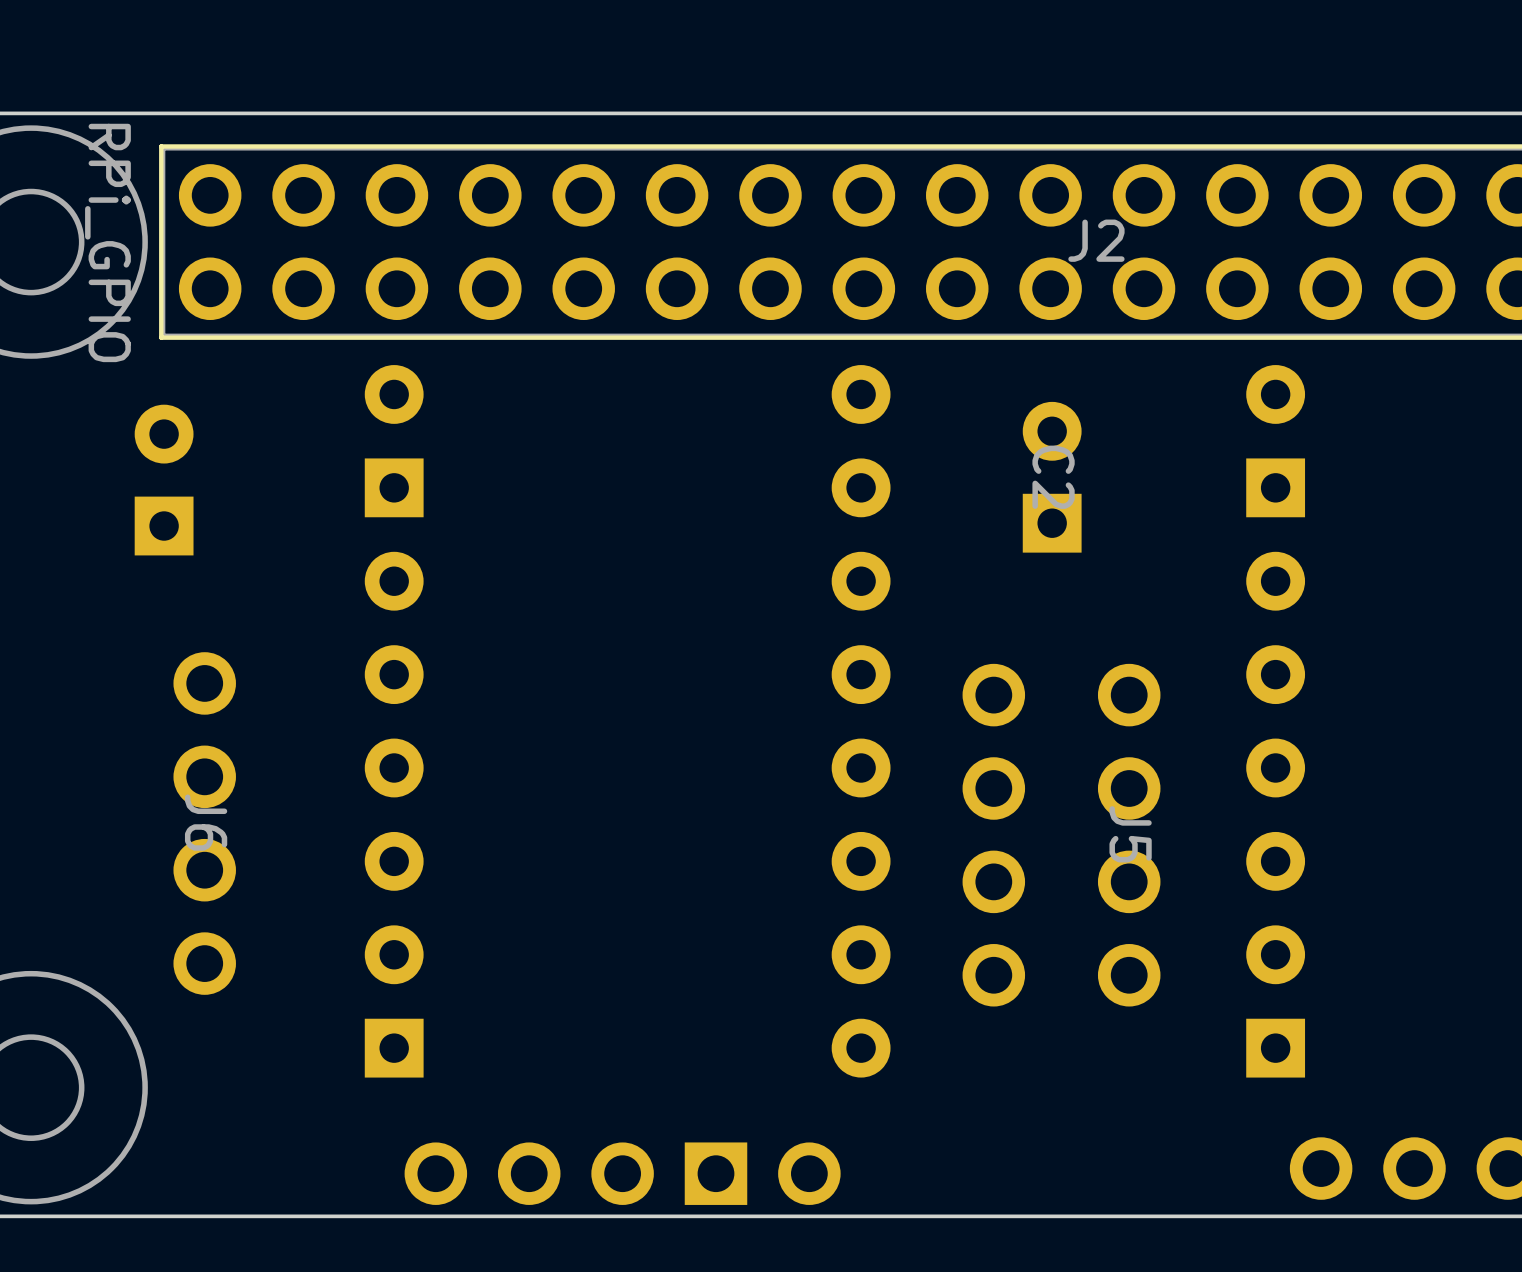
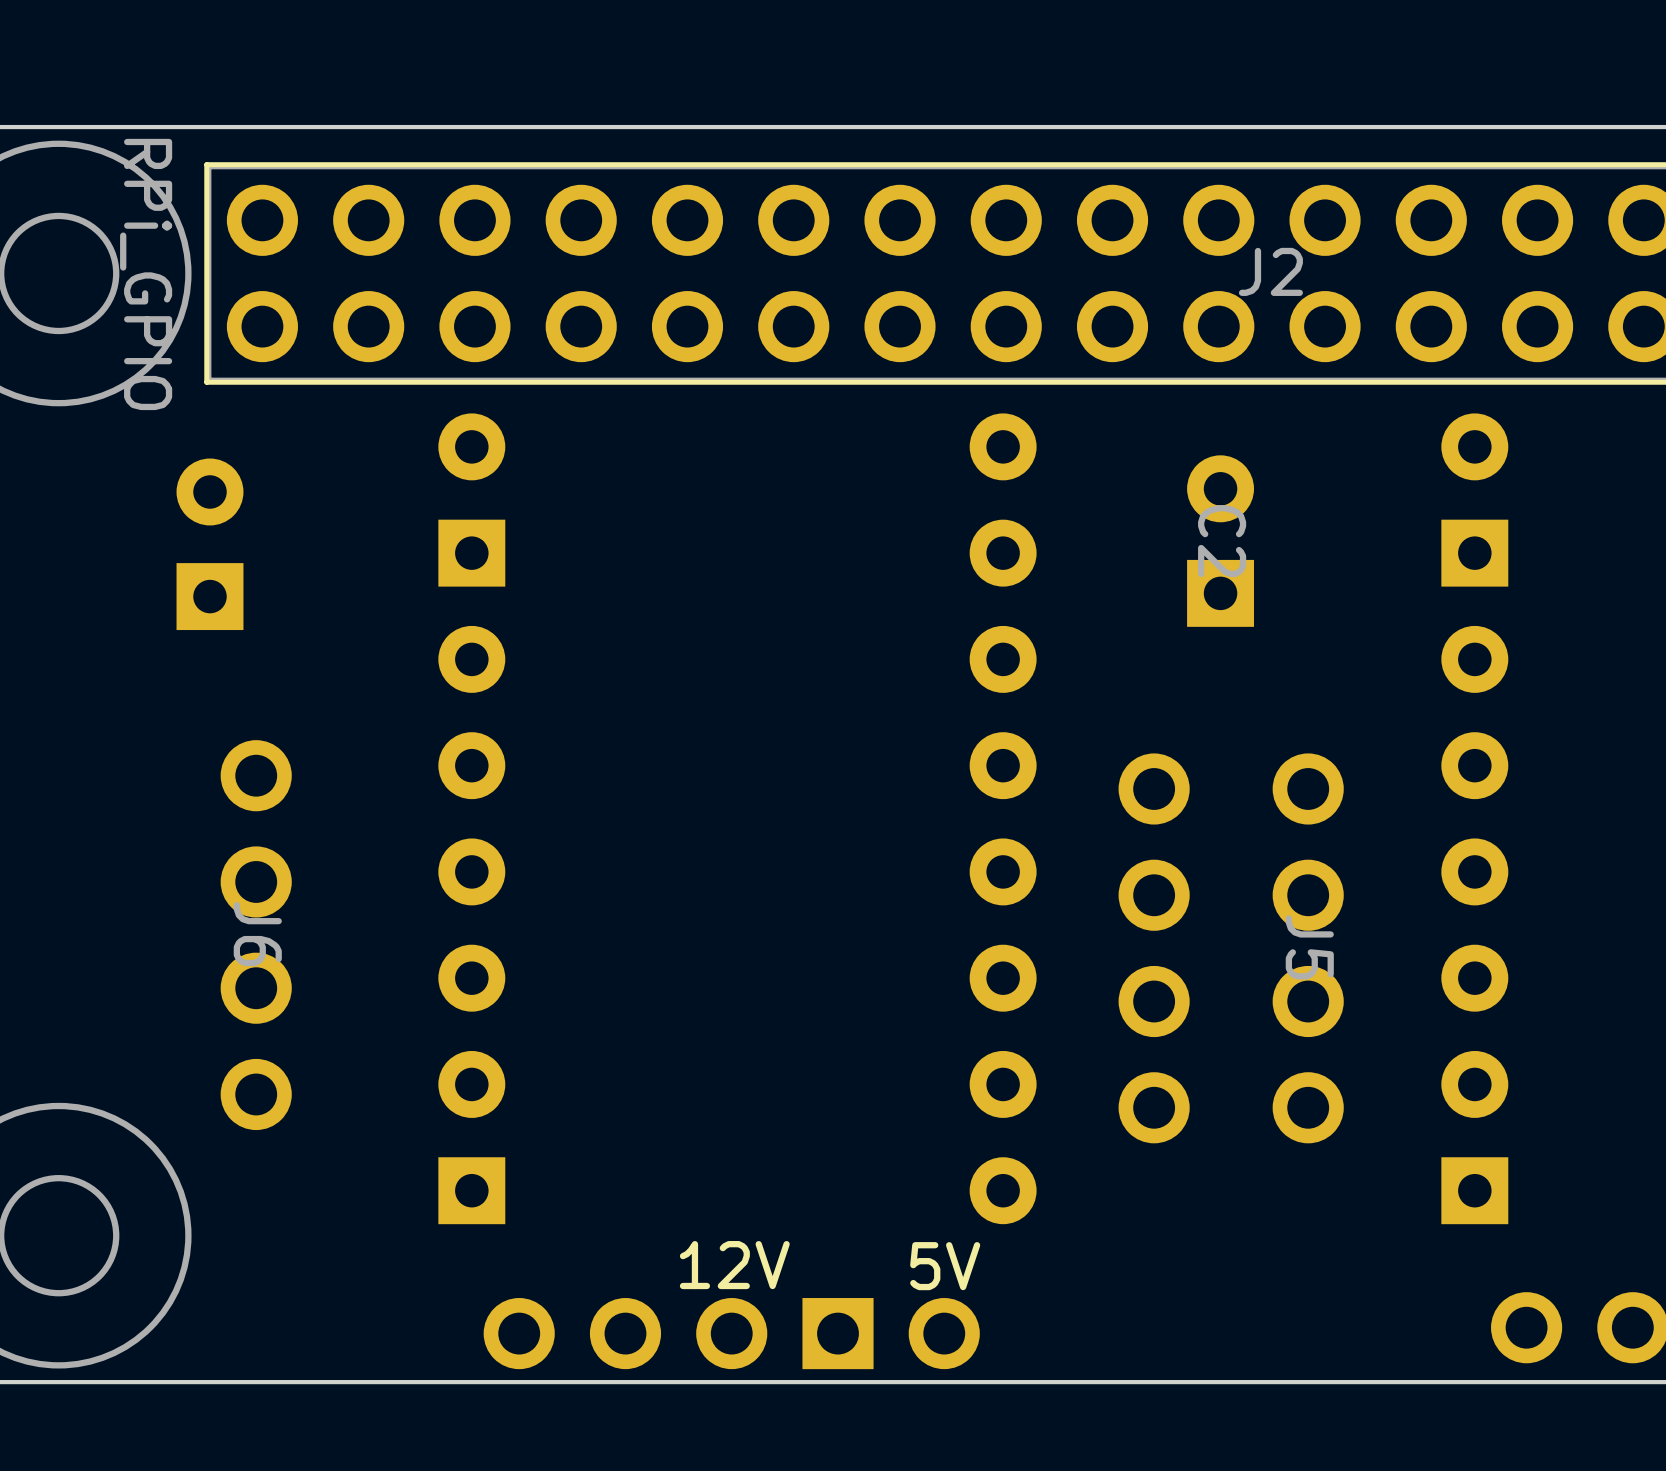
text: none -> 12V (734, 1265)
text: none -> 5V (945, 1266)

